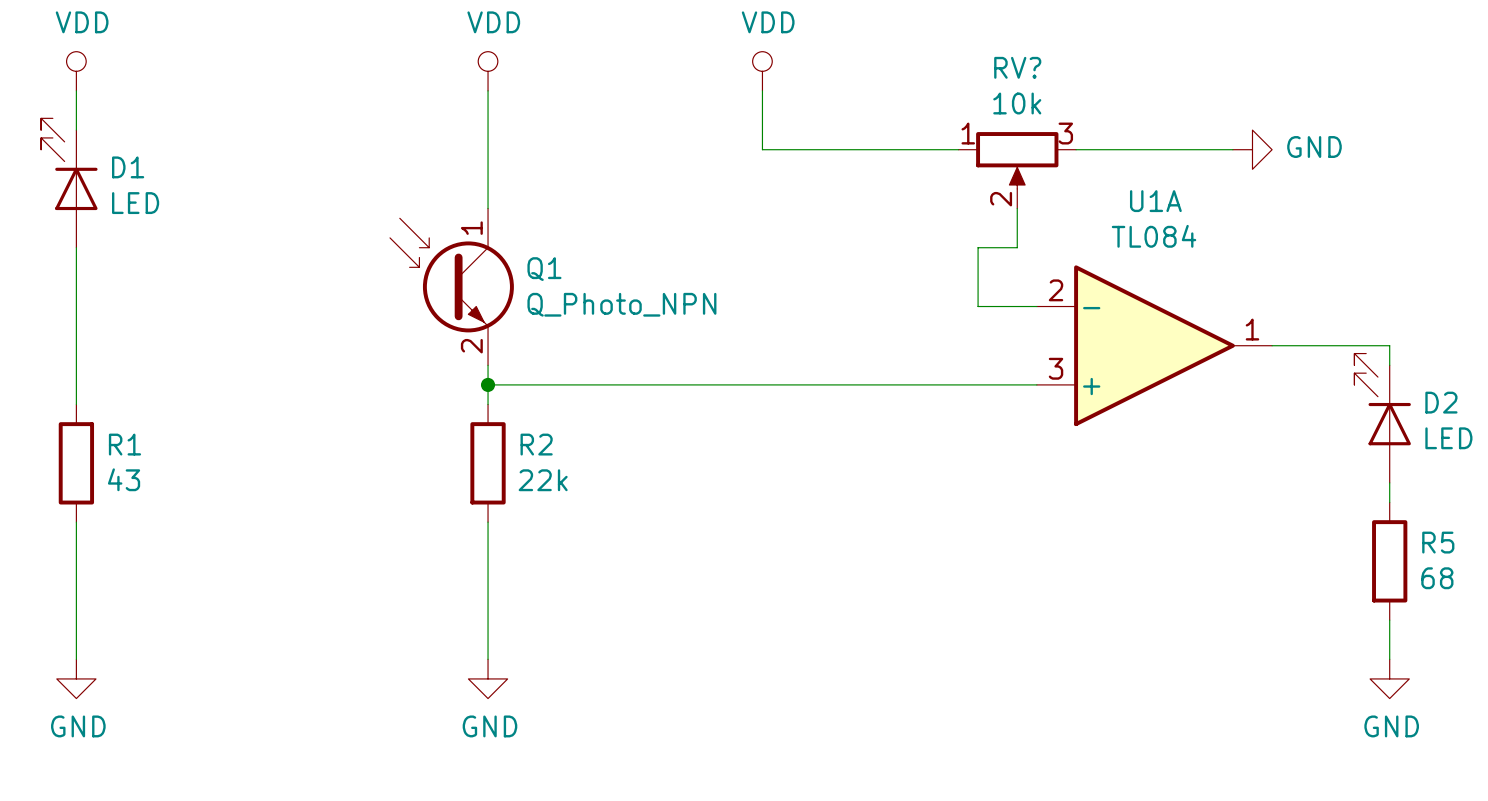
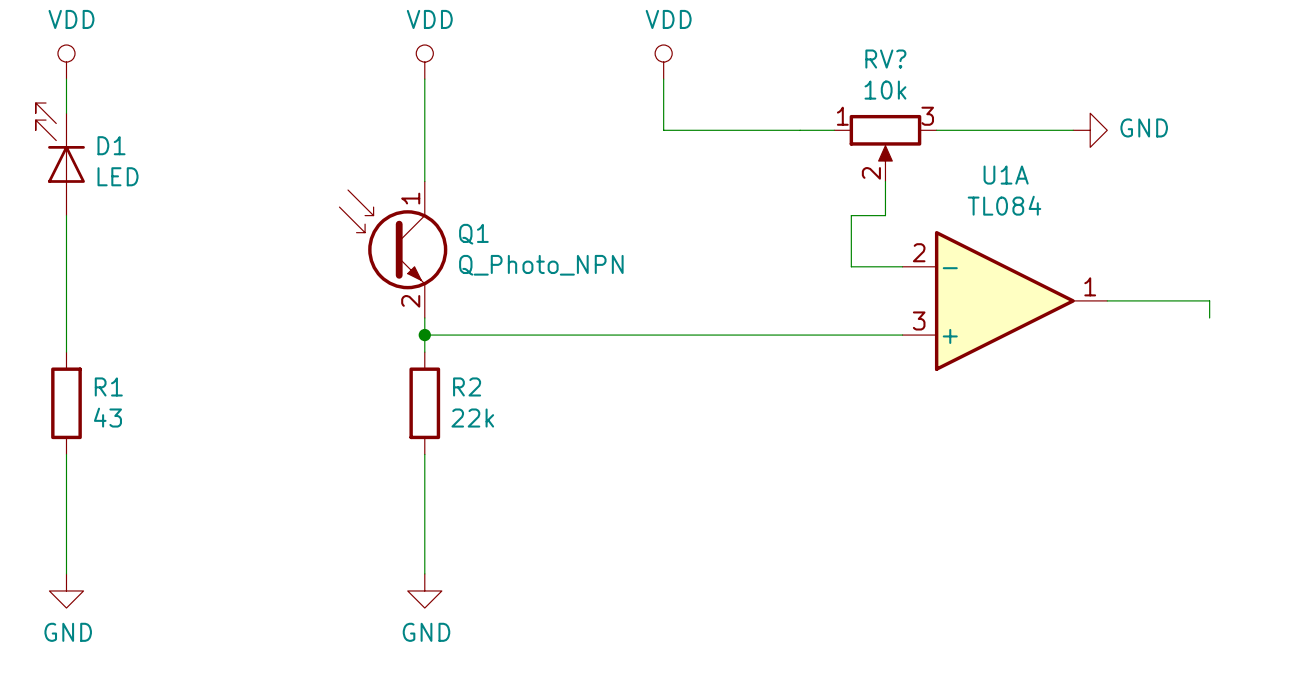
D2: LED (1382, 418) -> none
wire: (1389, 482) (1389, 502) -> none
R5: 68 (1389, 561) -> none
wire: (1389, 620) (1389, 659) -> none
power symbol: GND (1389, 678) -> none

